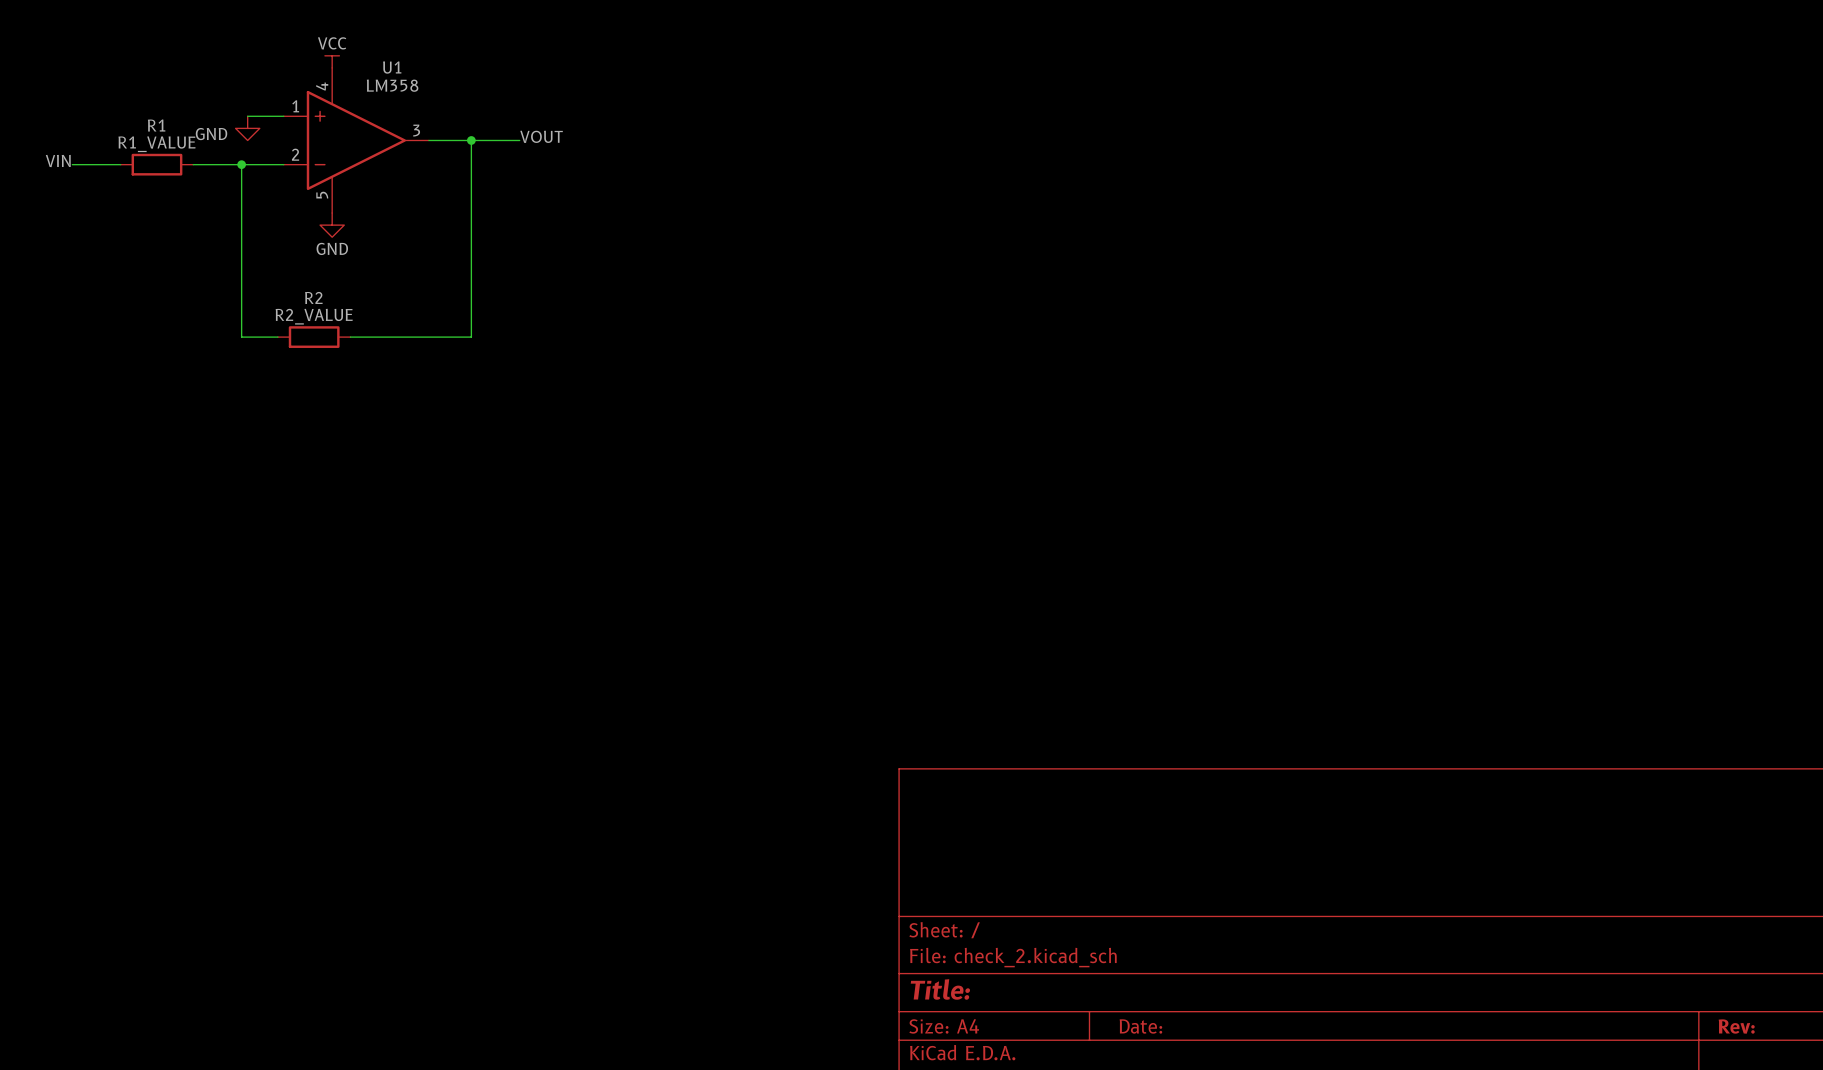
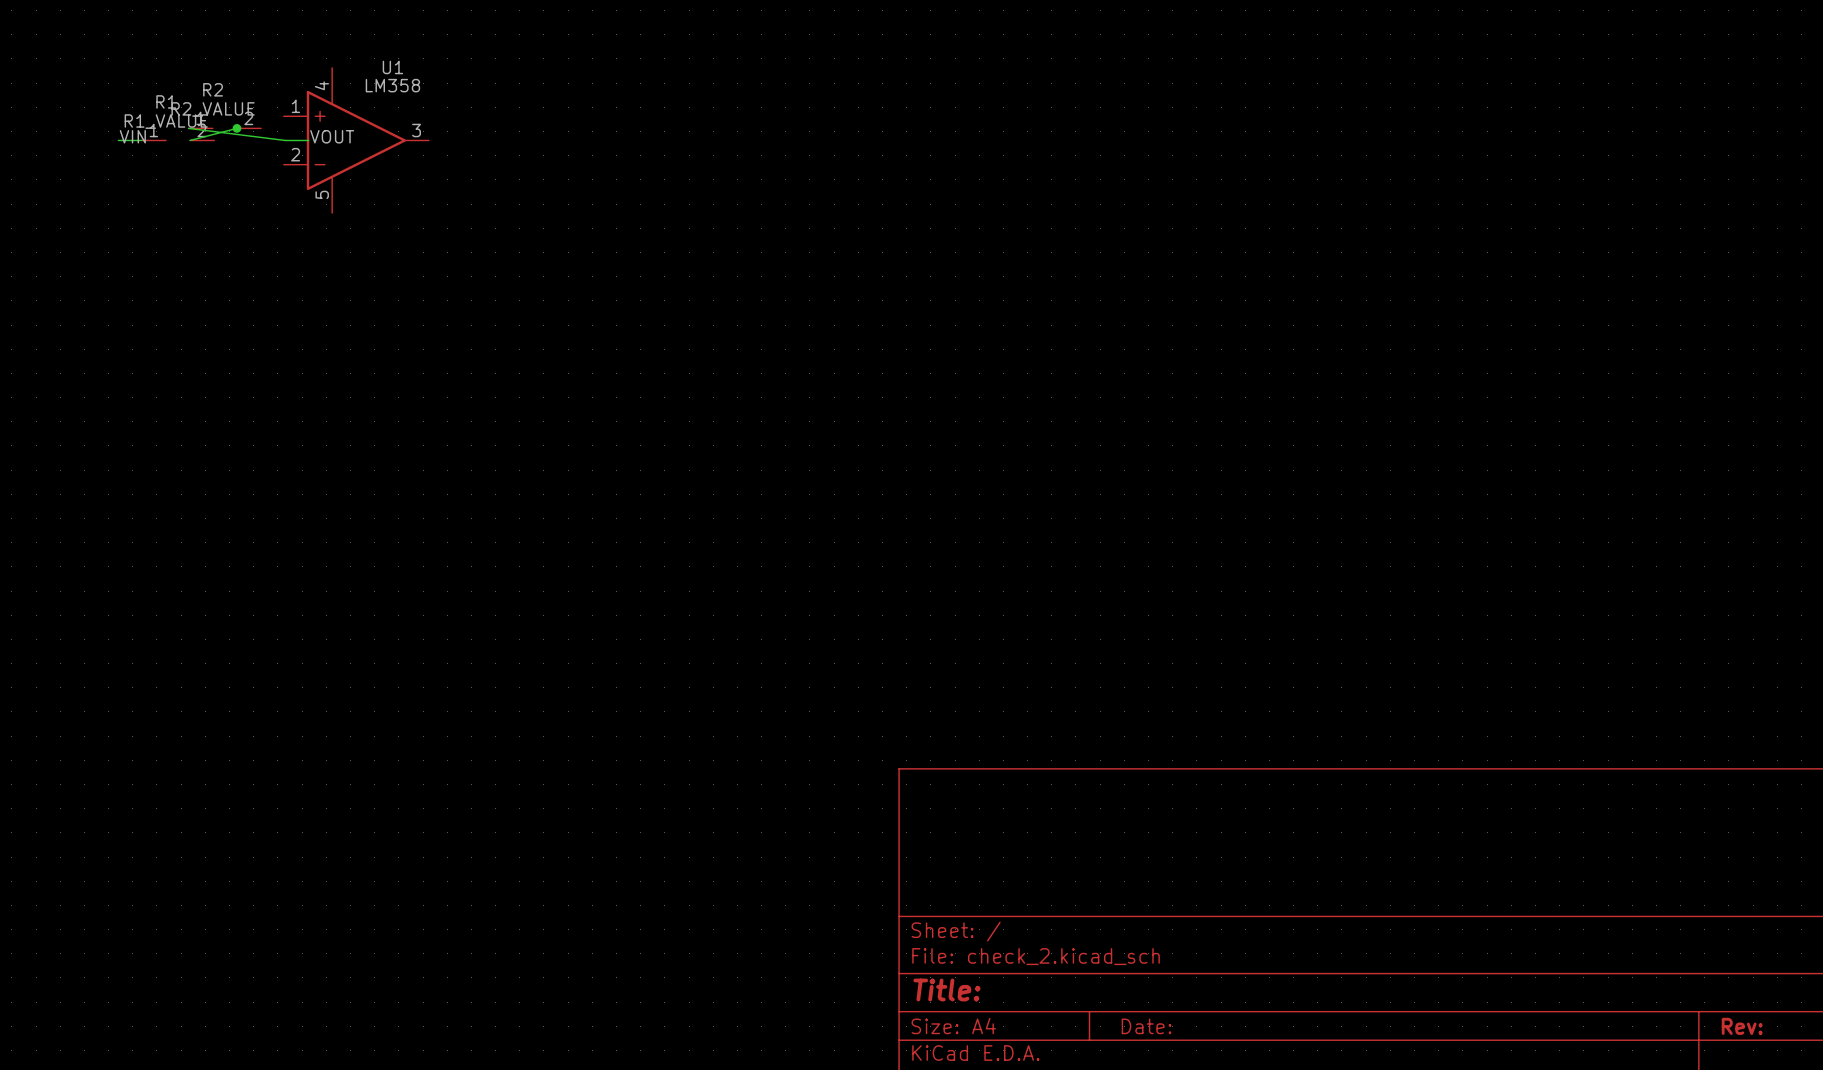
power symbol: VCC (332, 61) -> none
wire: (247, 116) (283, 116) -> none
wire: none -> (188, 128) (285, 140) (308, 140)
wire: none -> (236, 128) (190, 140)
power symbol: GND (247, 128) -> none
label position: VOUT (541, 136) -> VOUT (332, 136)
wire: none -> (118, 140) (141, 140)
wire: (428, 140) (519, 140) -> none
wire: (471, 140) (471, 337) (350, 337) -> none
junction: (471, 140) -> none
R1 symbol: [120, 153, 194, 176] -> [141, 140, 215, 141]
label position: VIN (58, 161) -> VIN (132, 136)
wire: (72, 164) (120, 164) -> none
wire: (193, 164) (283, 164) -> none
wire: (241, 164) (241, 337) (277, 337) -> none
junction position: (241, 164) -> (236, 128)
power symbol: GND (332, 225) -> none
R2 symbol: [277, 326, 351, 348] -> [188, 128, 262, 129]

